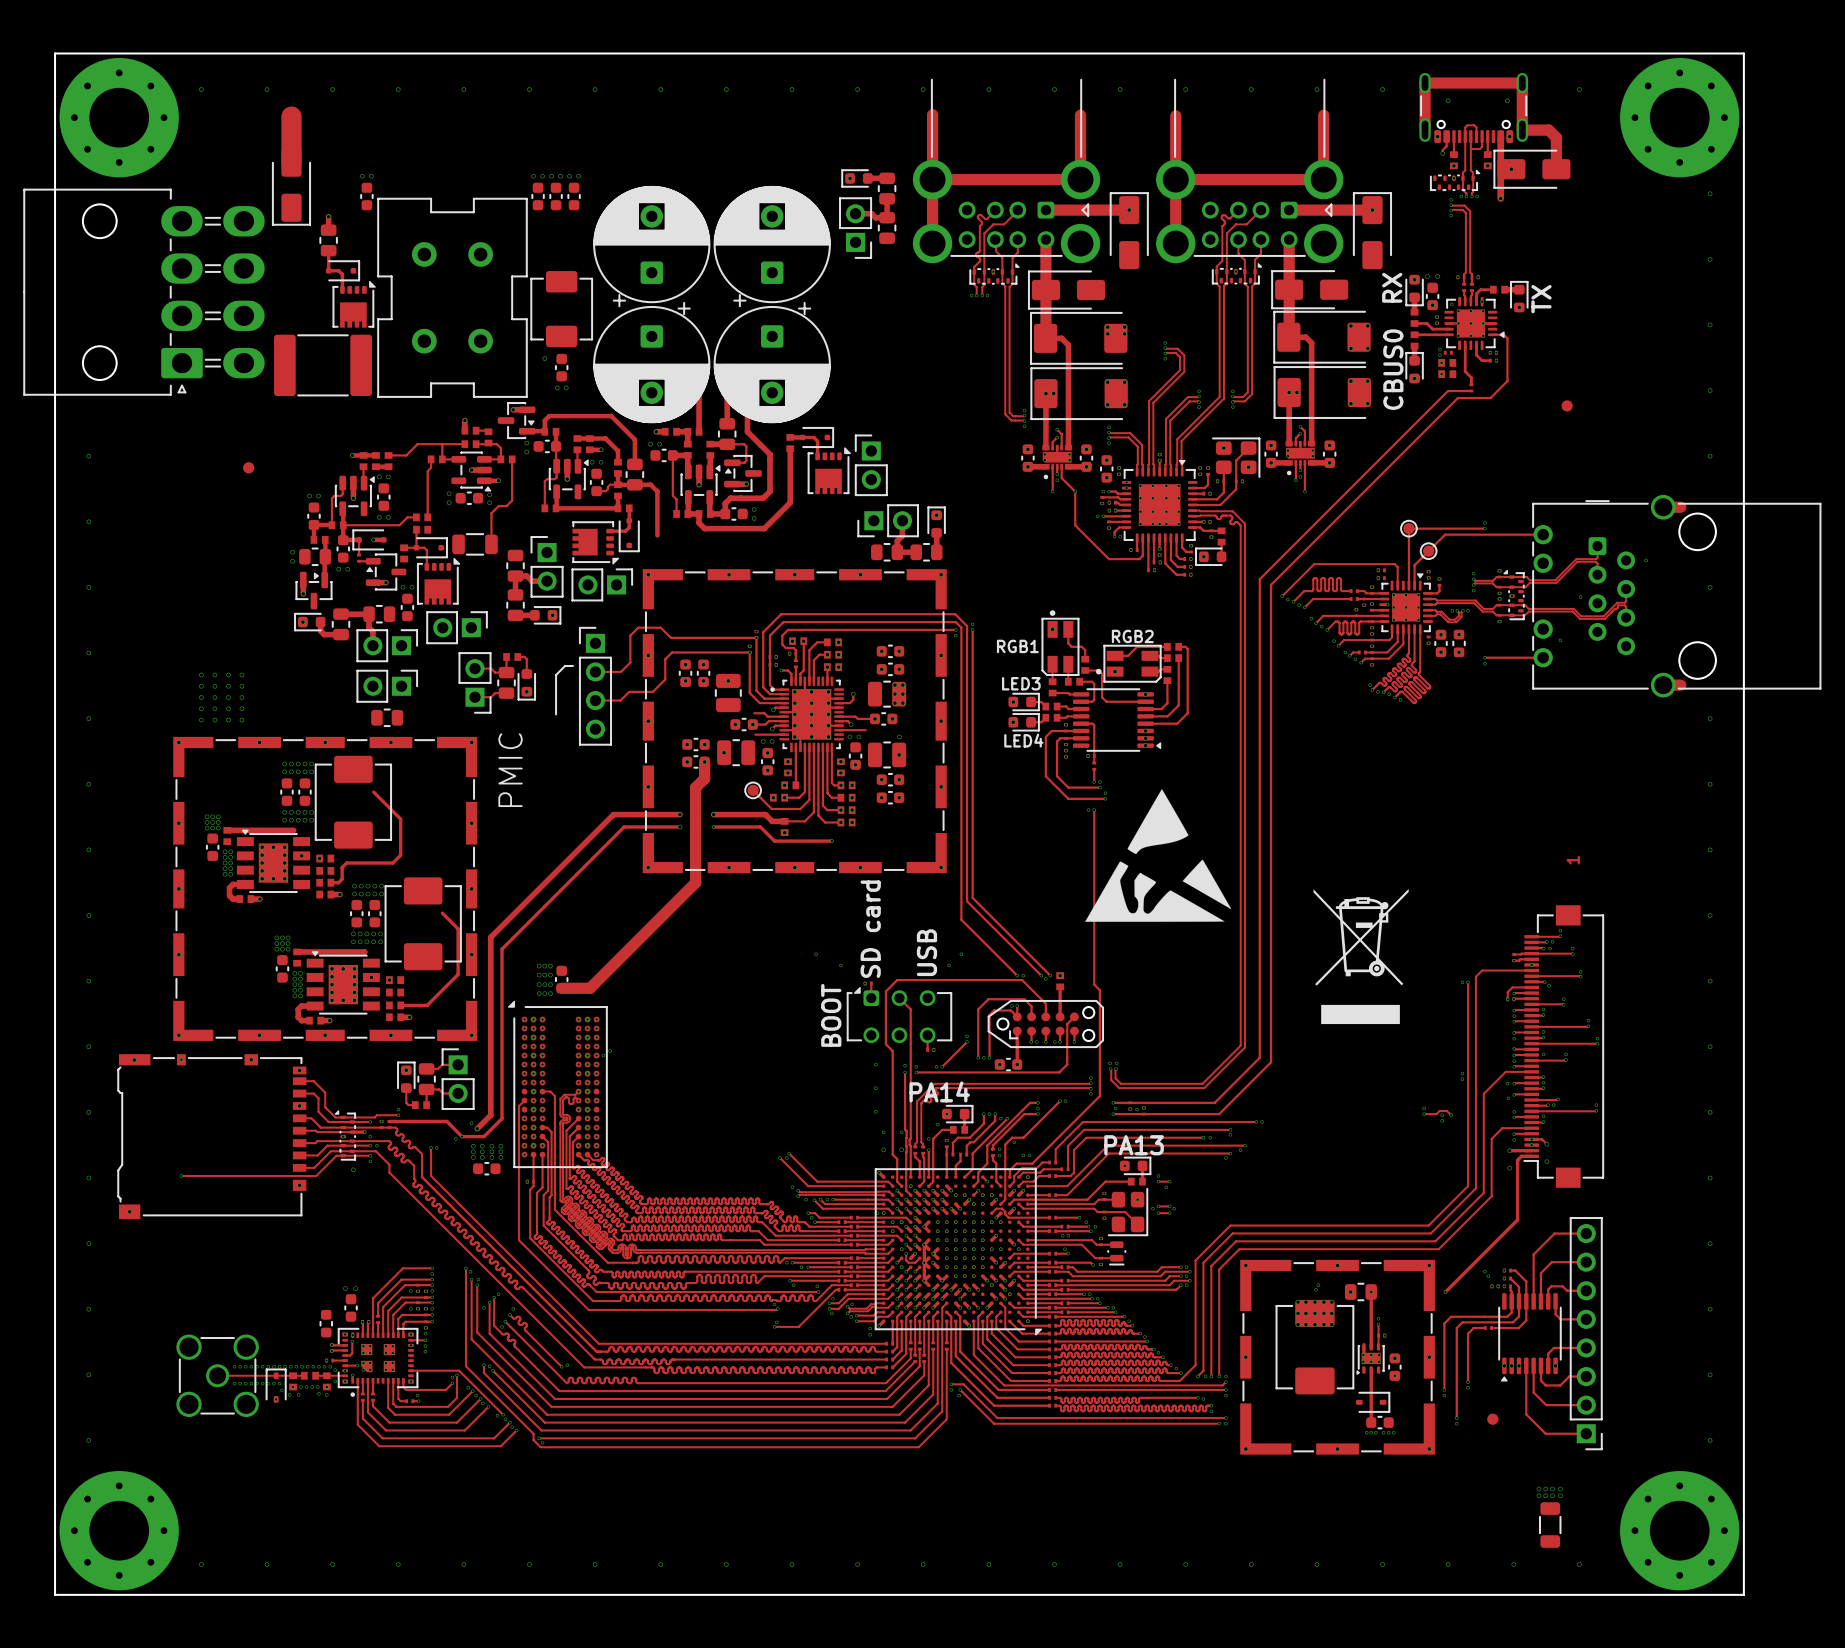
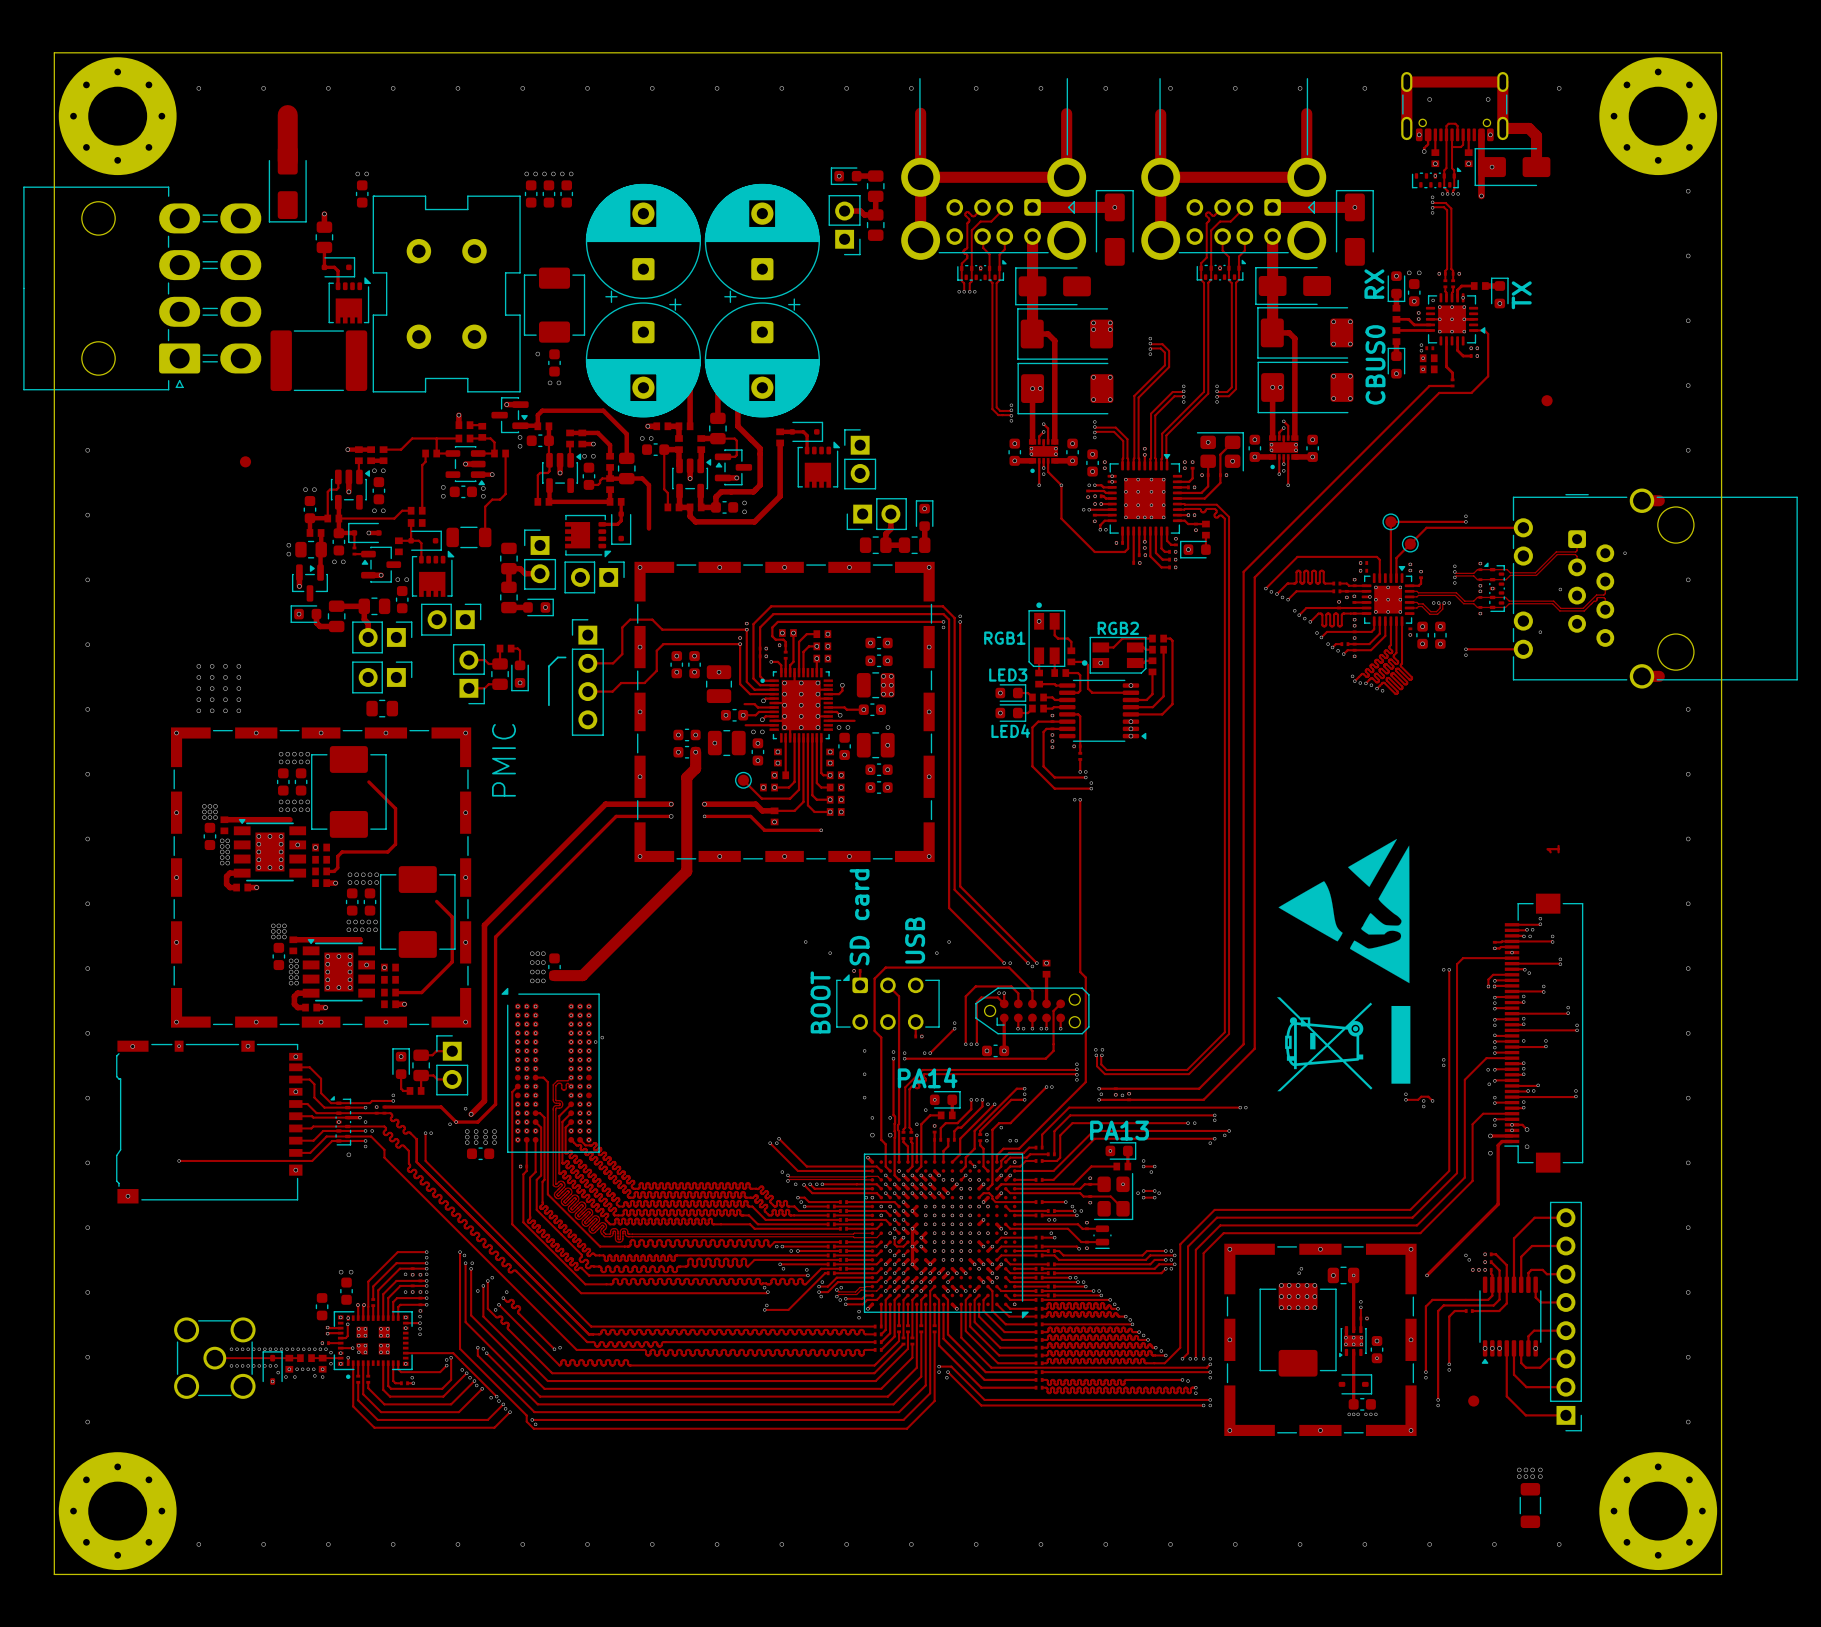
drawing: [1085, 789, 1232, 922] -> none
drawing: none -> [1278, 838, 1410, 984]
drawing: [1313, 888, 1409, 1025] -> none
drawing: none -> [1276, 997, 1411, 1092]

